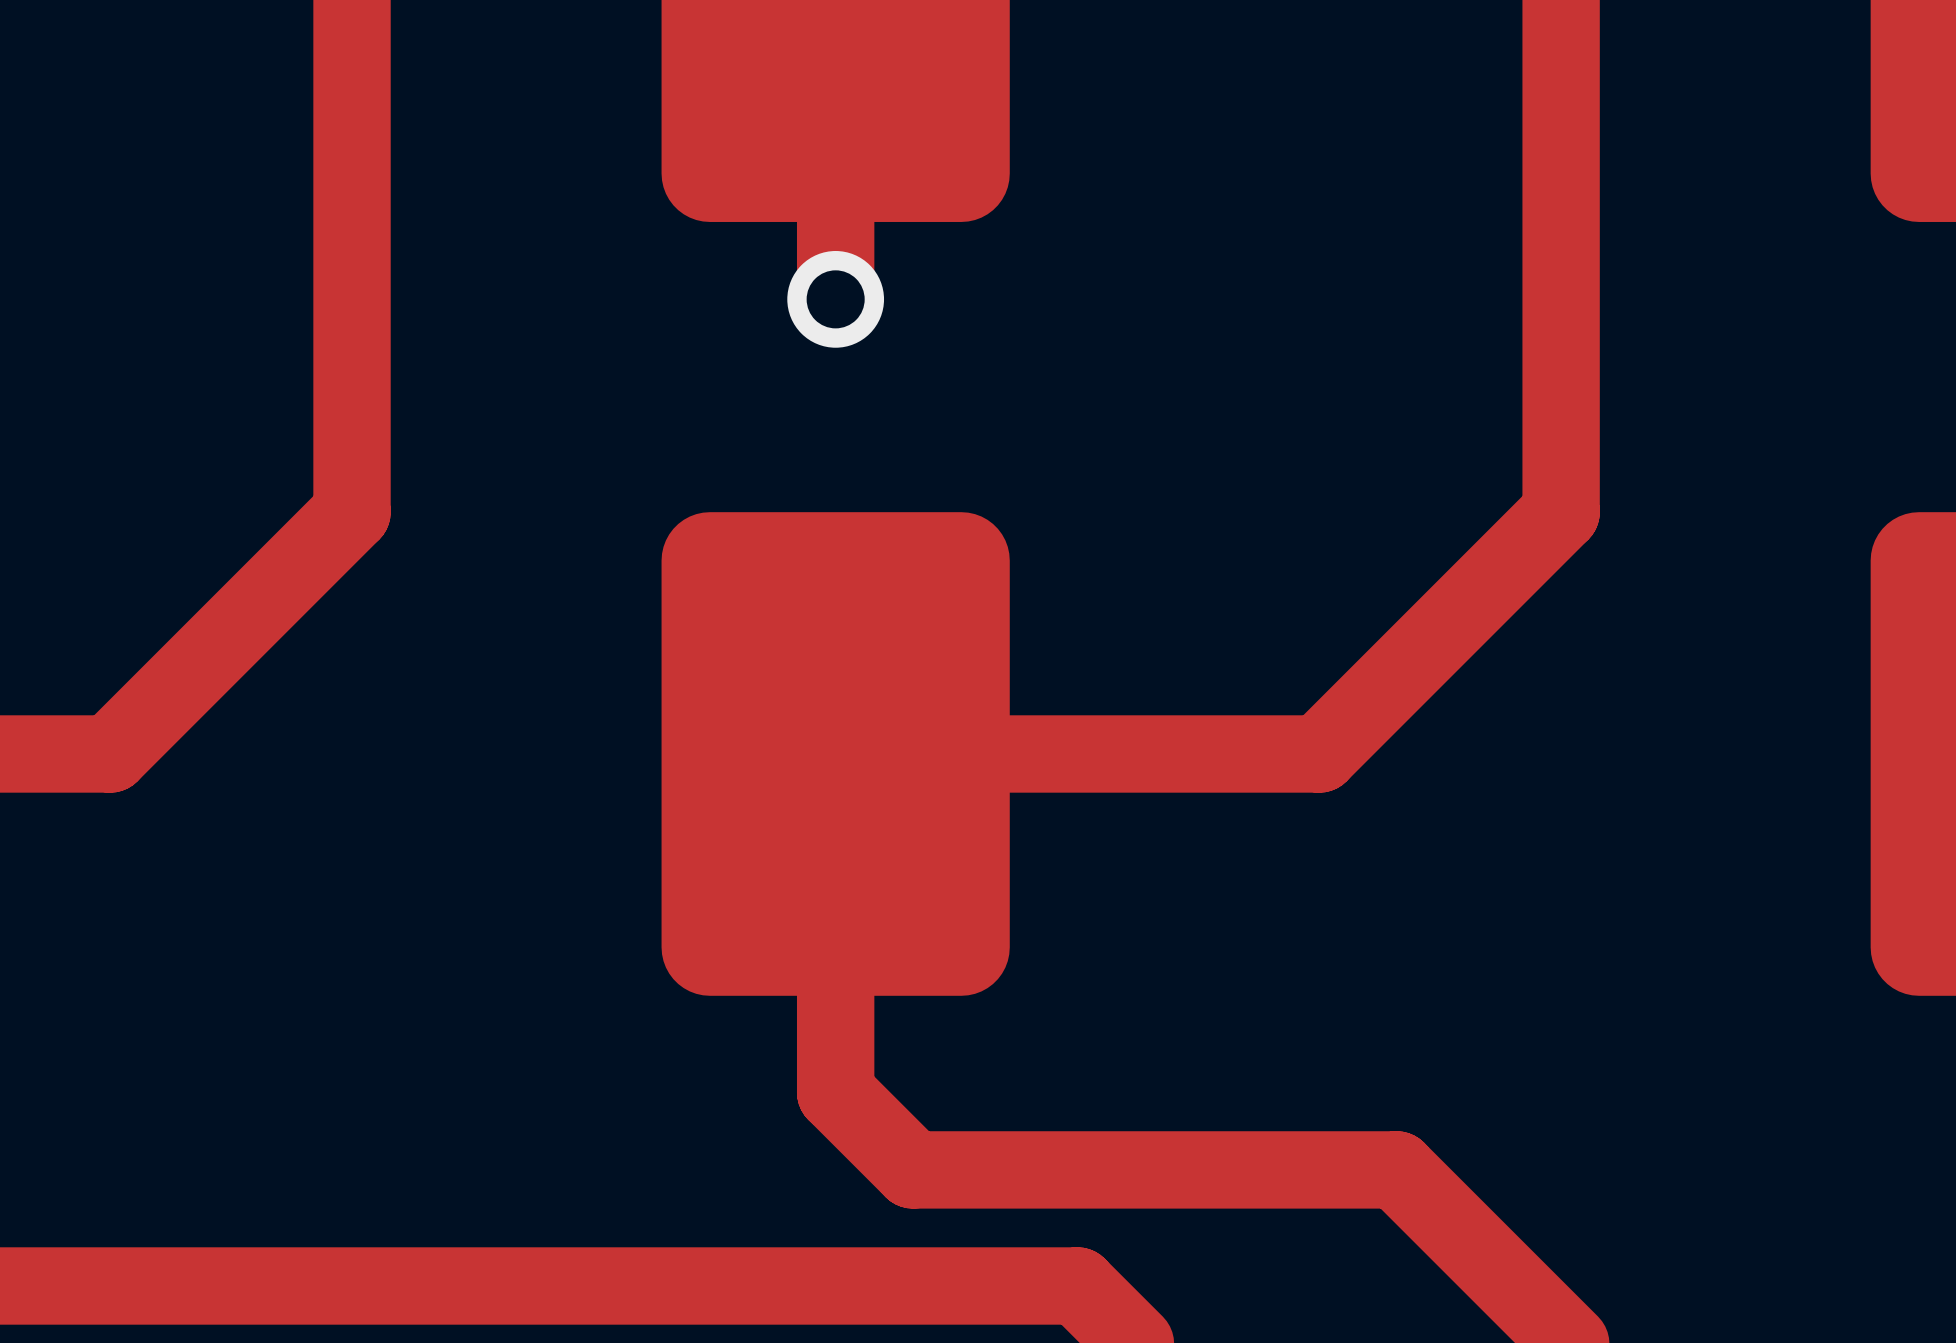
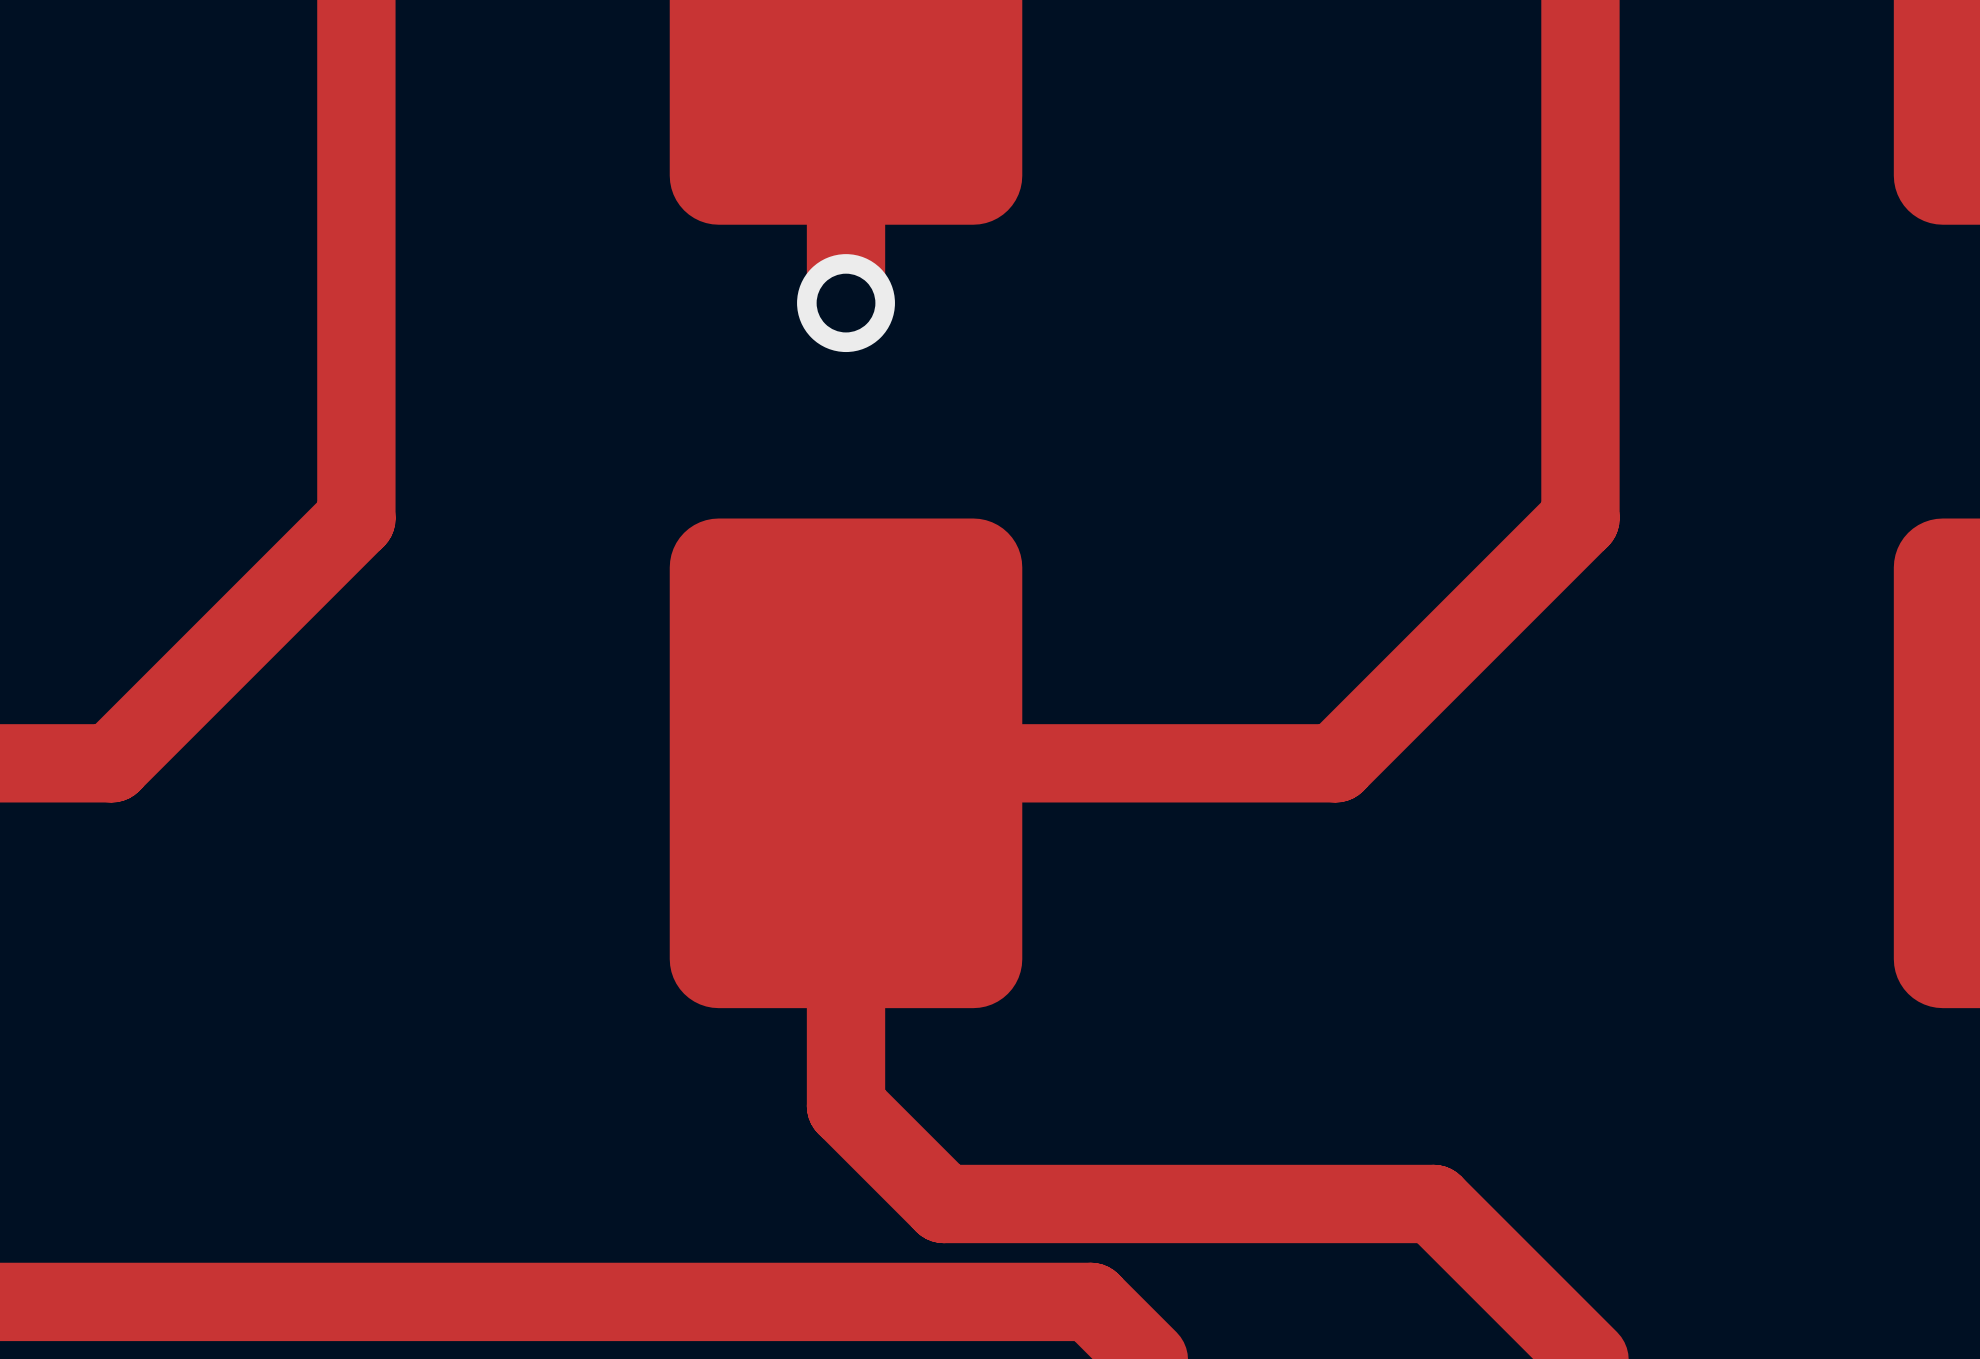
top track: (913, 1169) (1396, 1169) (1416, 1189) -> (924, 1184) (943, 1203) (1433, 1203)

